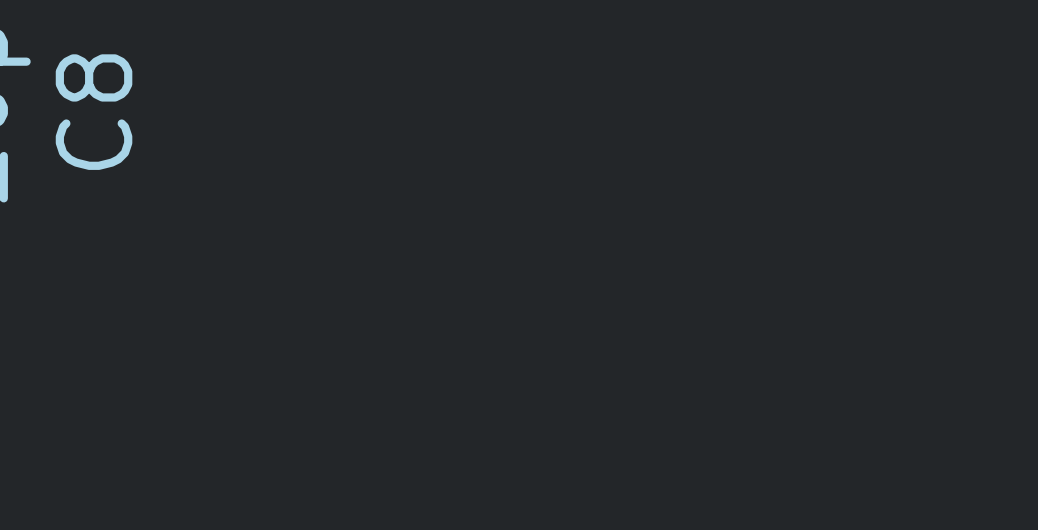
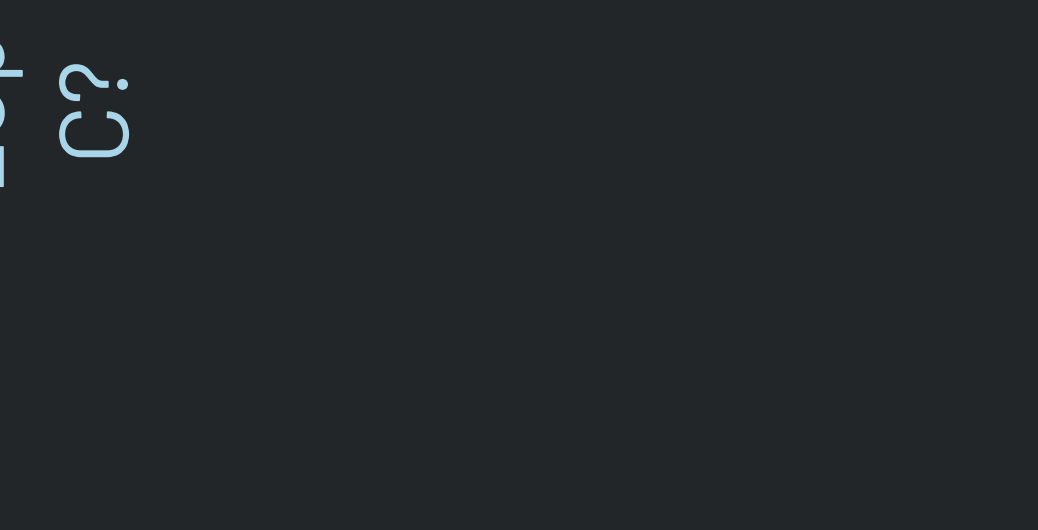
C8 name: C8 (94, 112) -> C? (94, 110)

